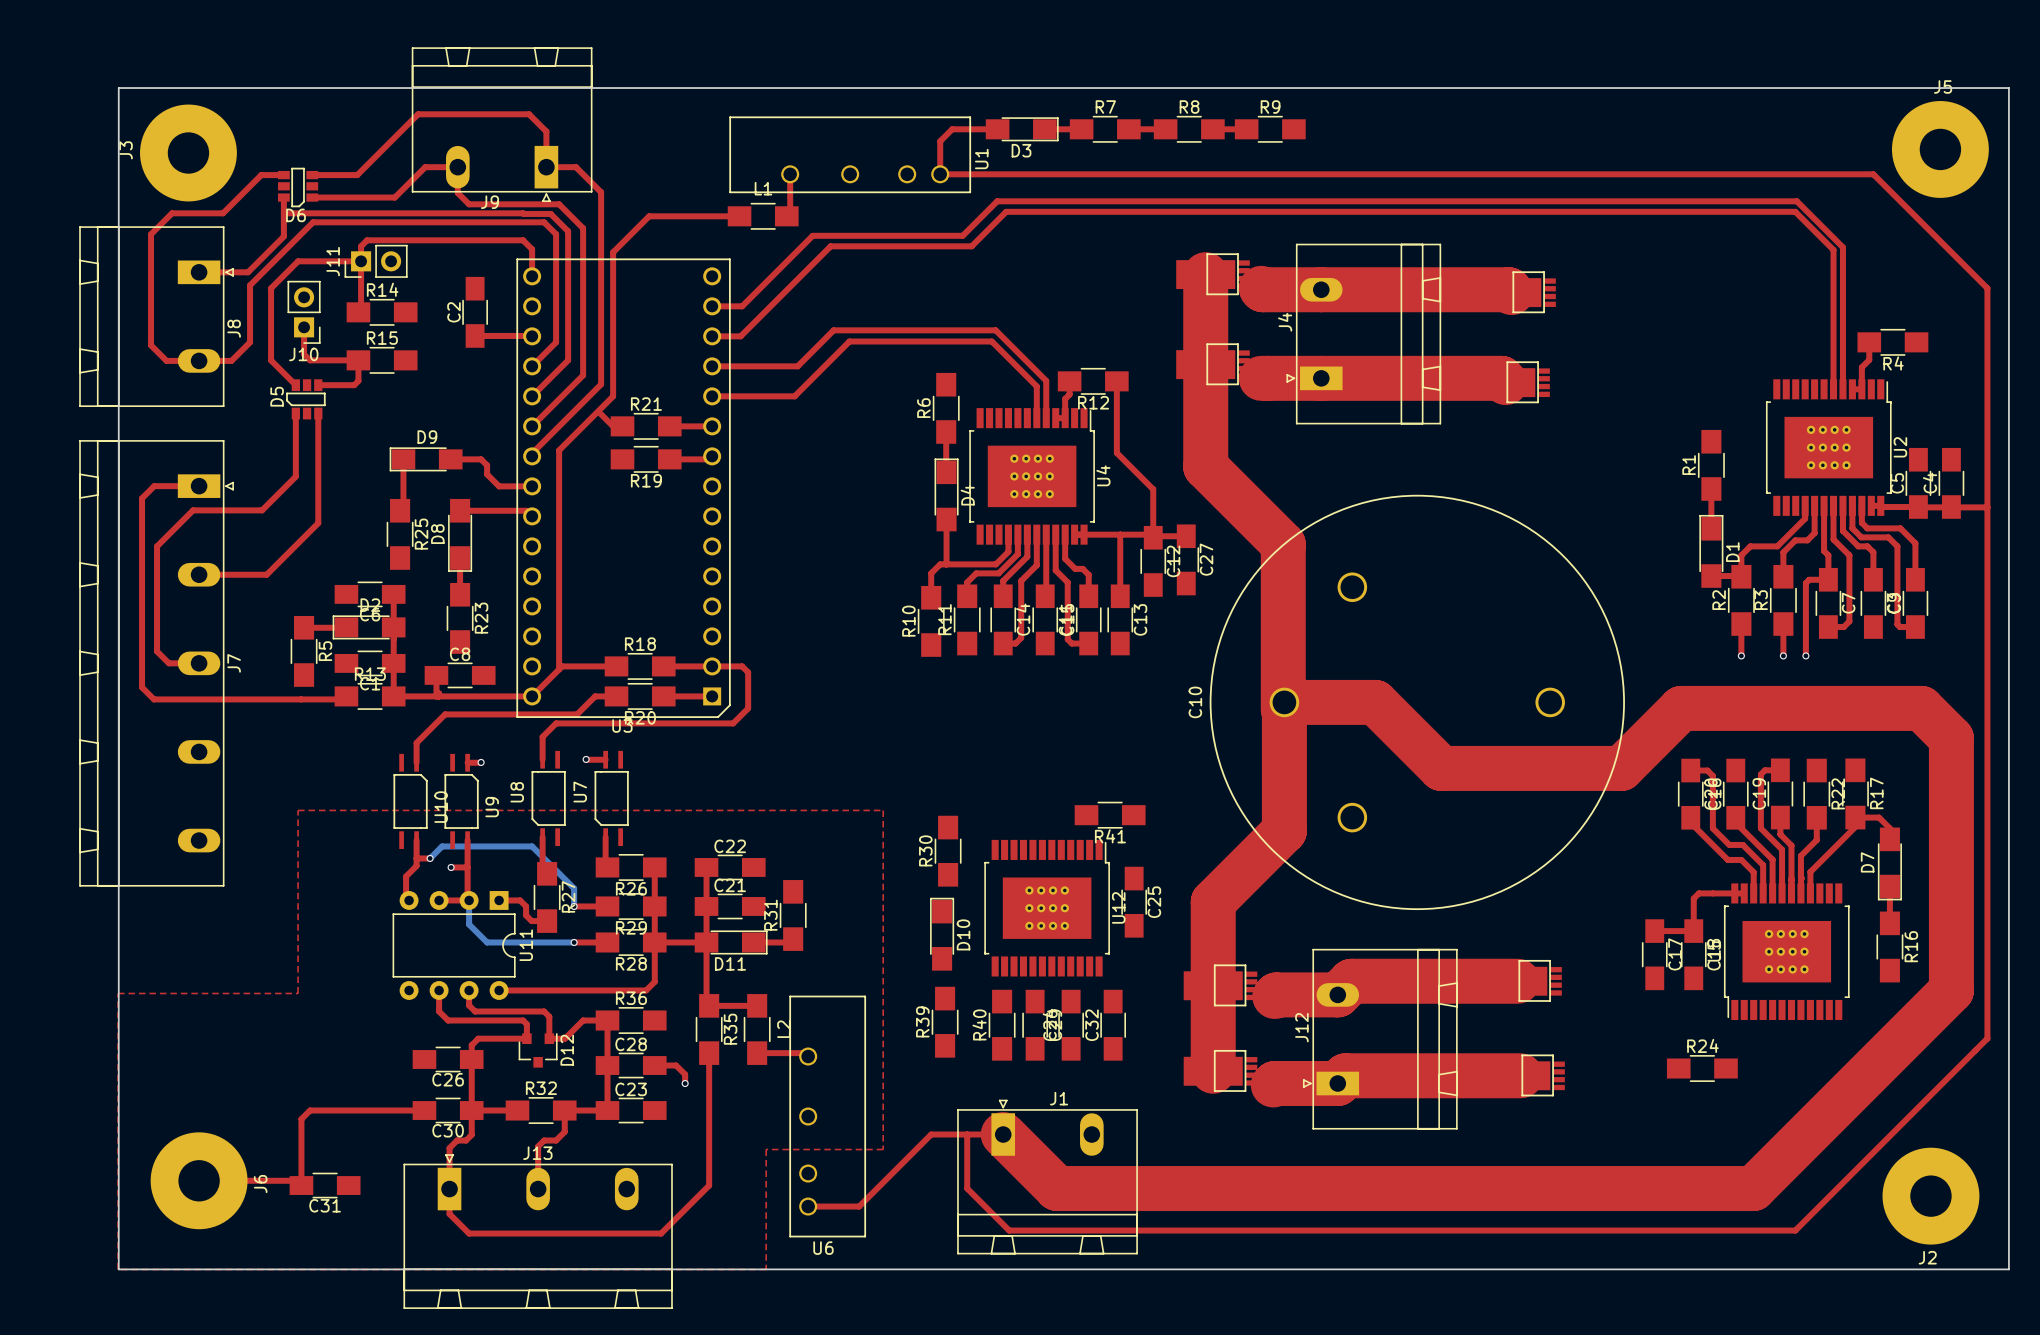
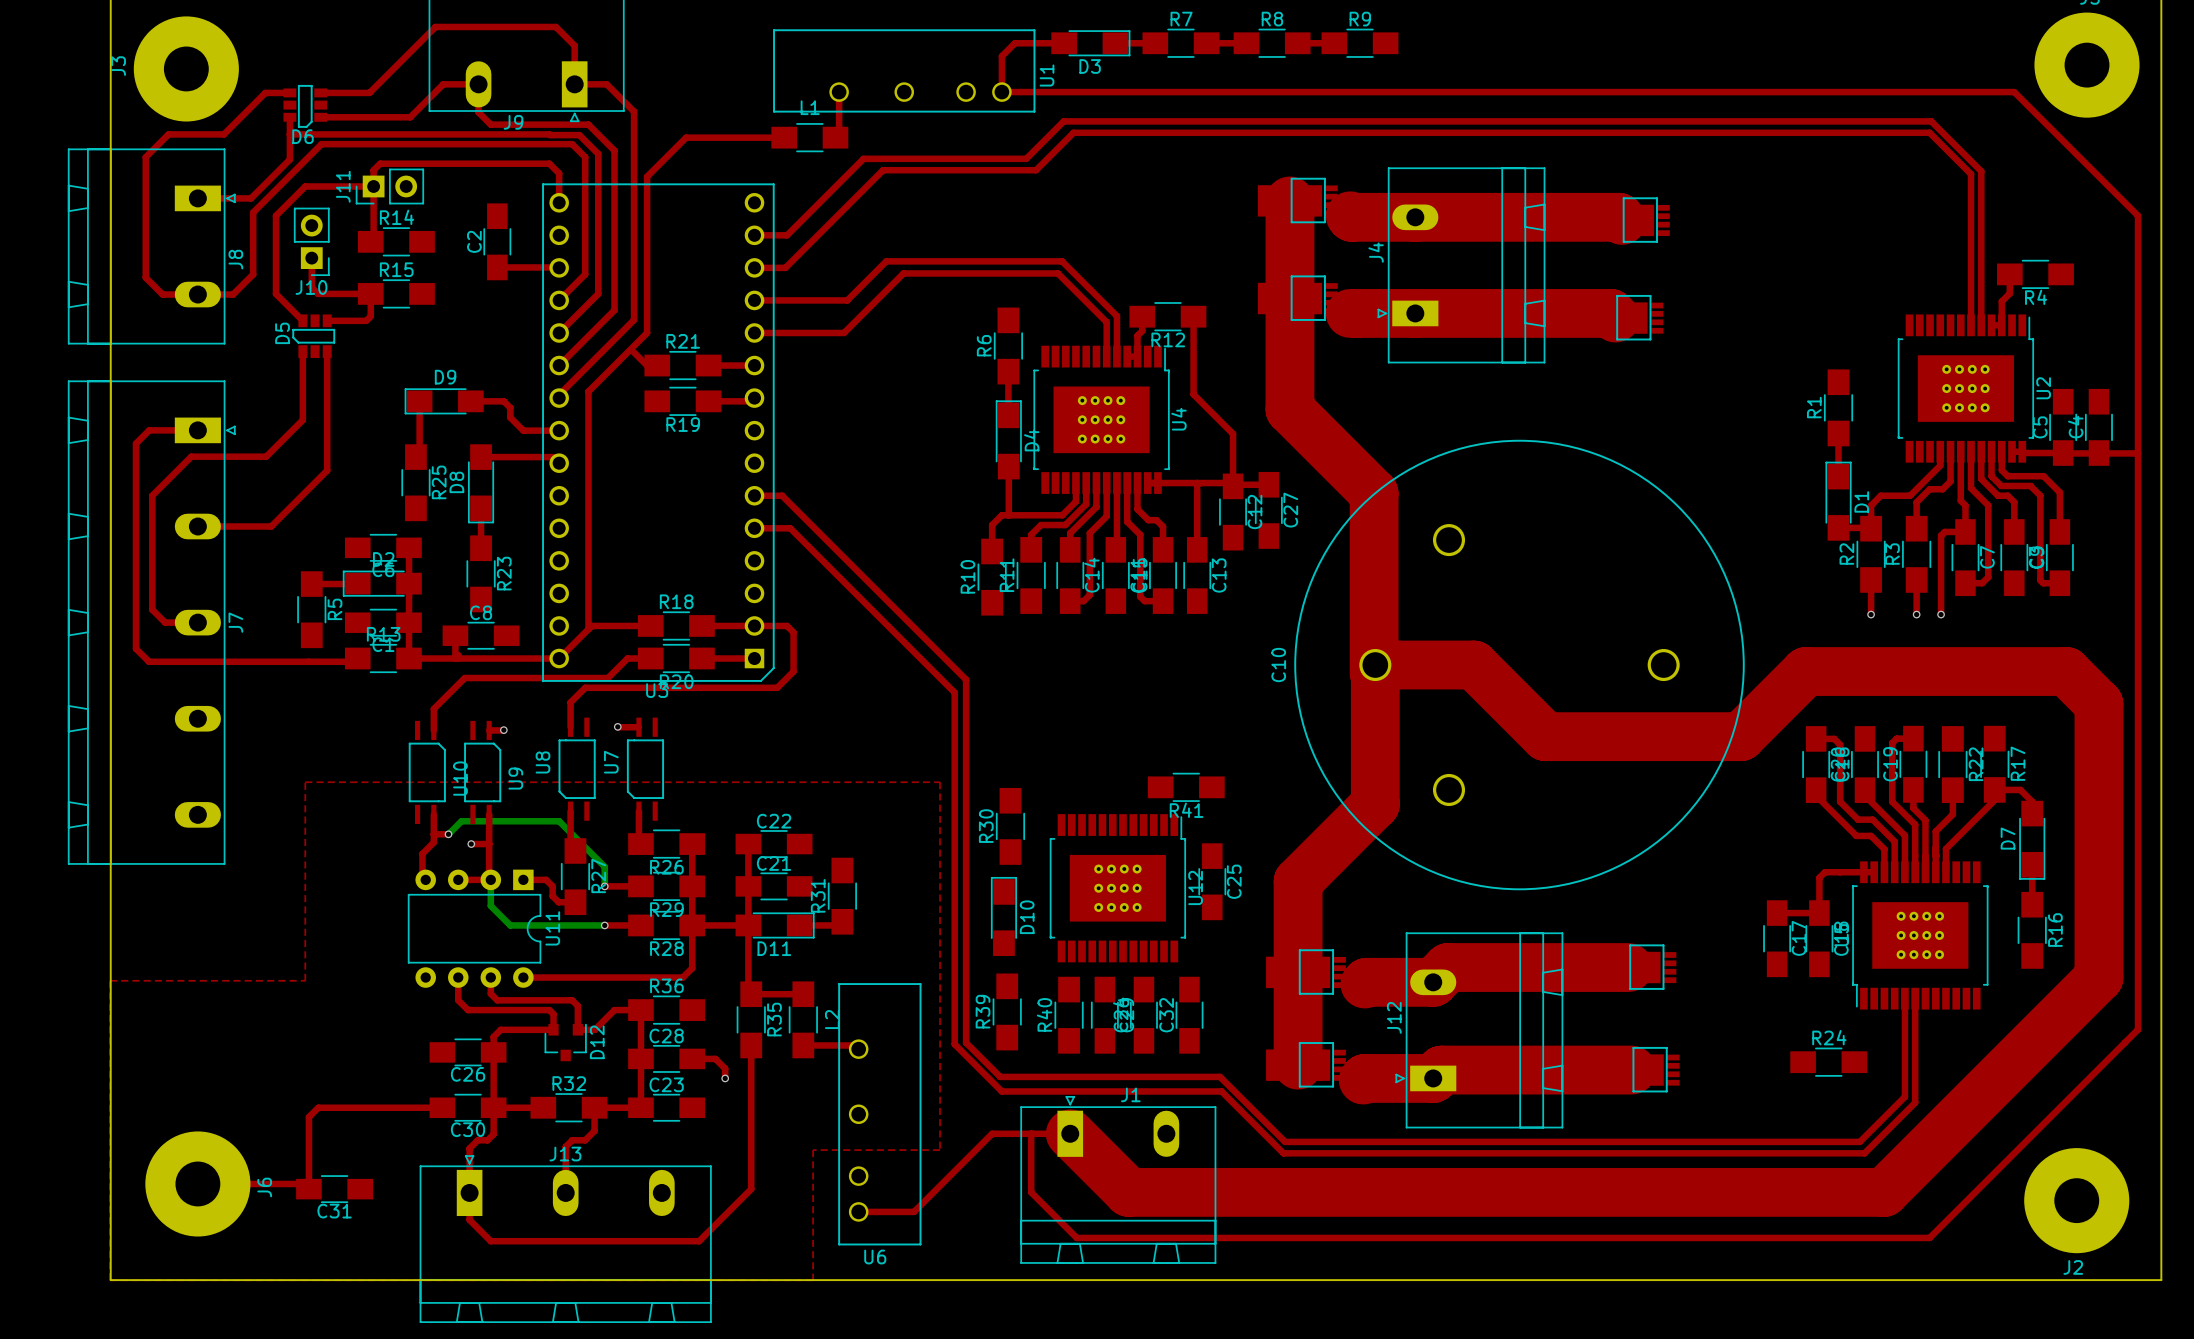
top track: none -> (754, 495) (782, 495) (966, 679) (966, 1042) (1000, 1076) (1220, 1076) (1285, 1141) (1859, 1141) (1904, 1096) (1904, 998)
top track: none -> (754, 528) (790, 528) (954, 692) (954, 1044) (1001, 1091) (1221, 1091) (1283, 1153) (1864, 1153) (1915, 1102) (1915, 998)

